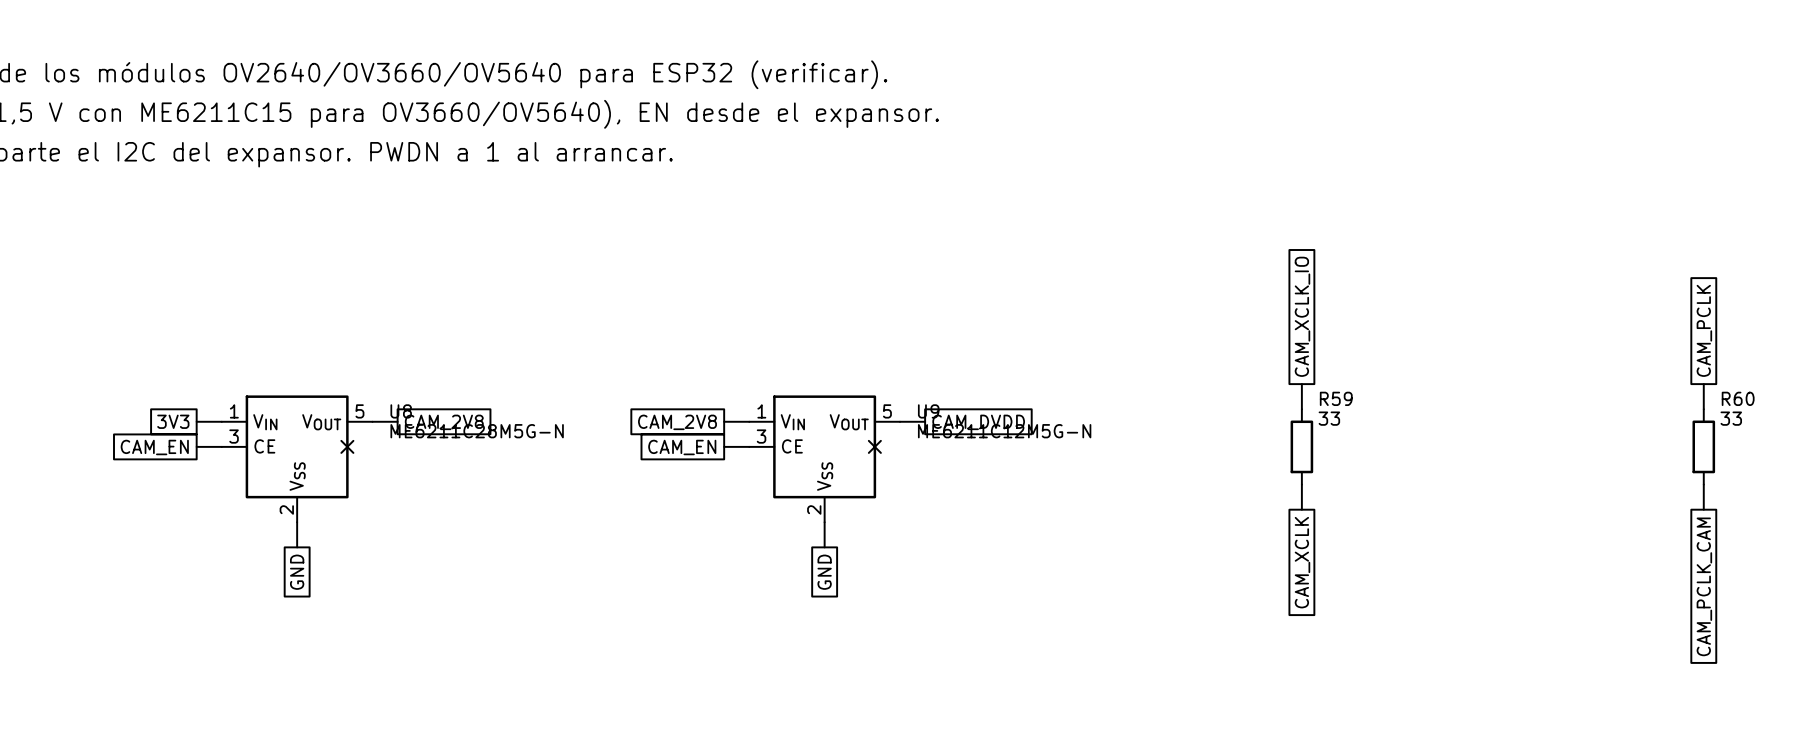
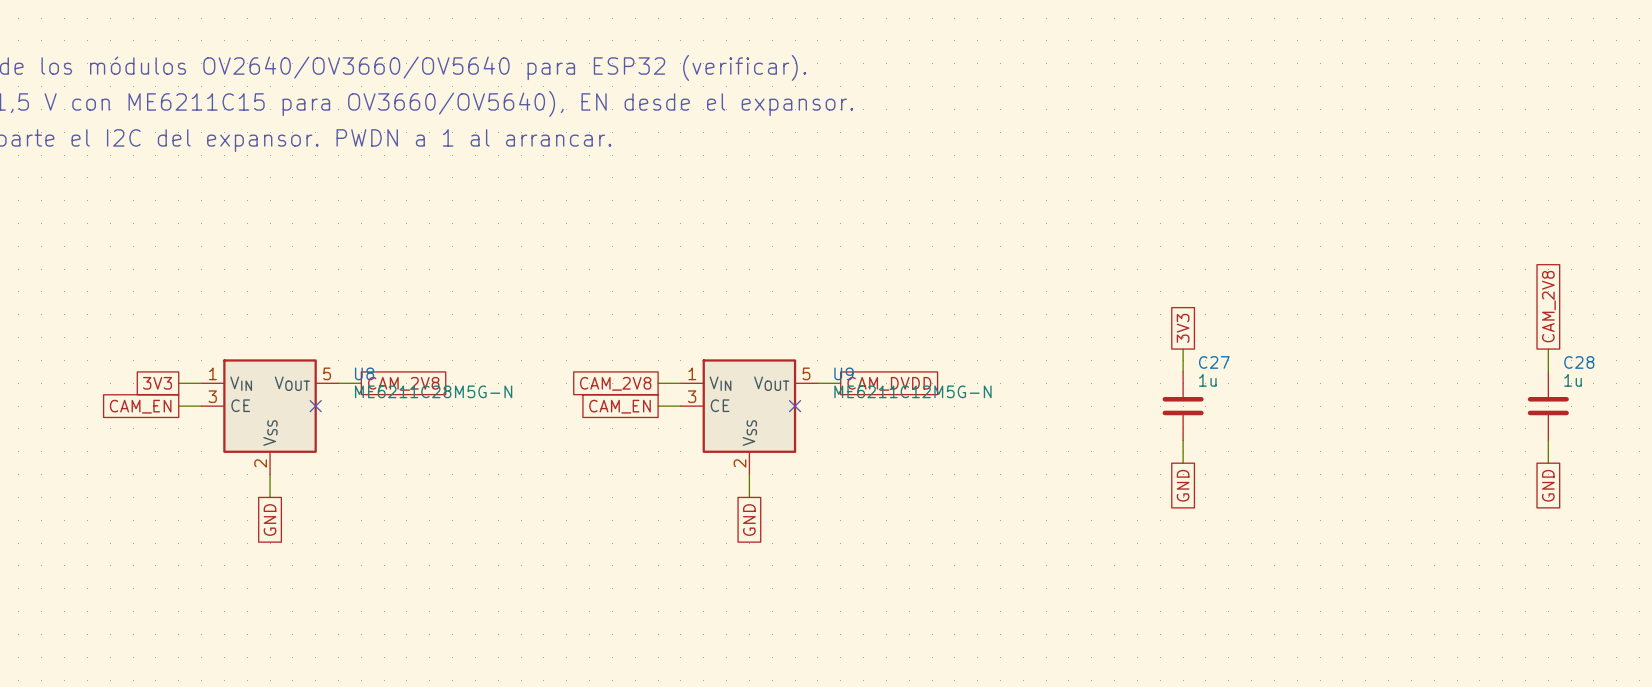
global label: CAM_XCLK_IO (1302, 316) -> 3V3 (1183, 328)
global label: CAM_PCLK (1704, 330) -> CAM_2V8 (1548, 306)
R59: 33 (1301, 446) -> none
C27: none -> 1u (1183, 406)
R60: 33 (1703, 446) -> none
C28: none -> 1u (1548, 406)
global label: CAM_XCLK (1302, 562) -> GND (1183, 485)
global label: CAM_PCLK_CAM (1704, 586) -> GND (1548, 485)

